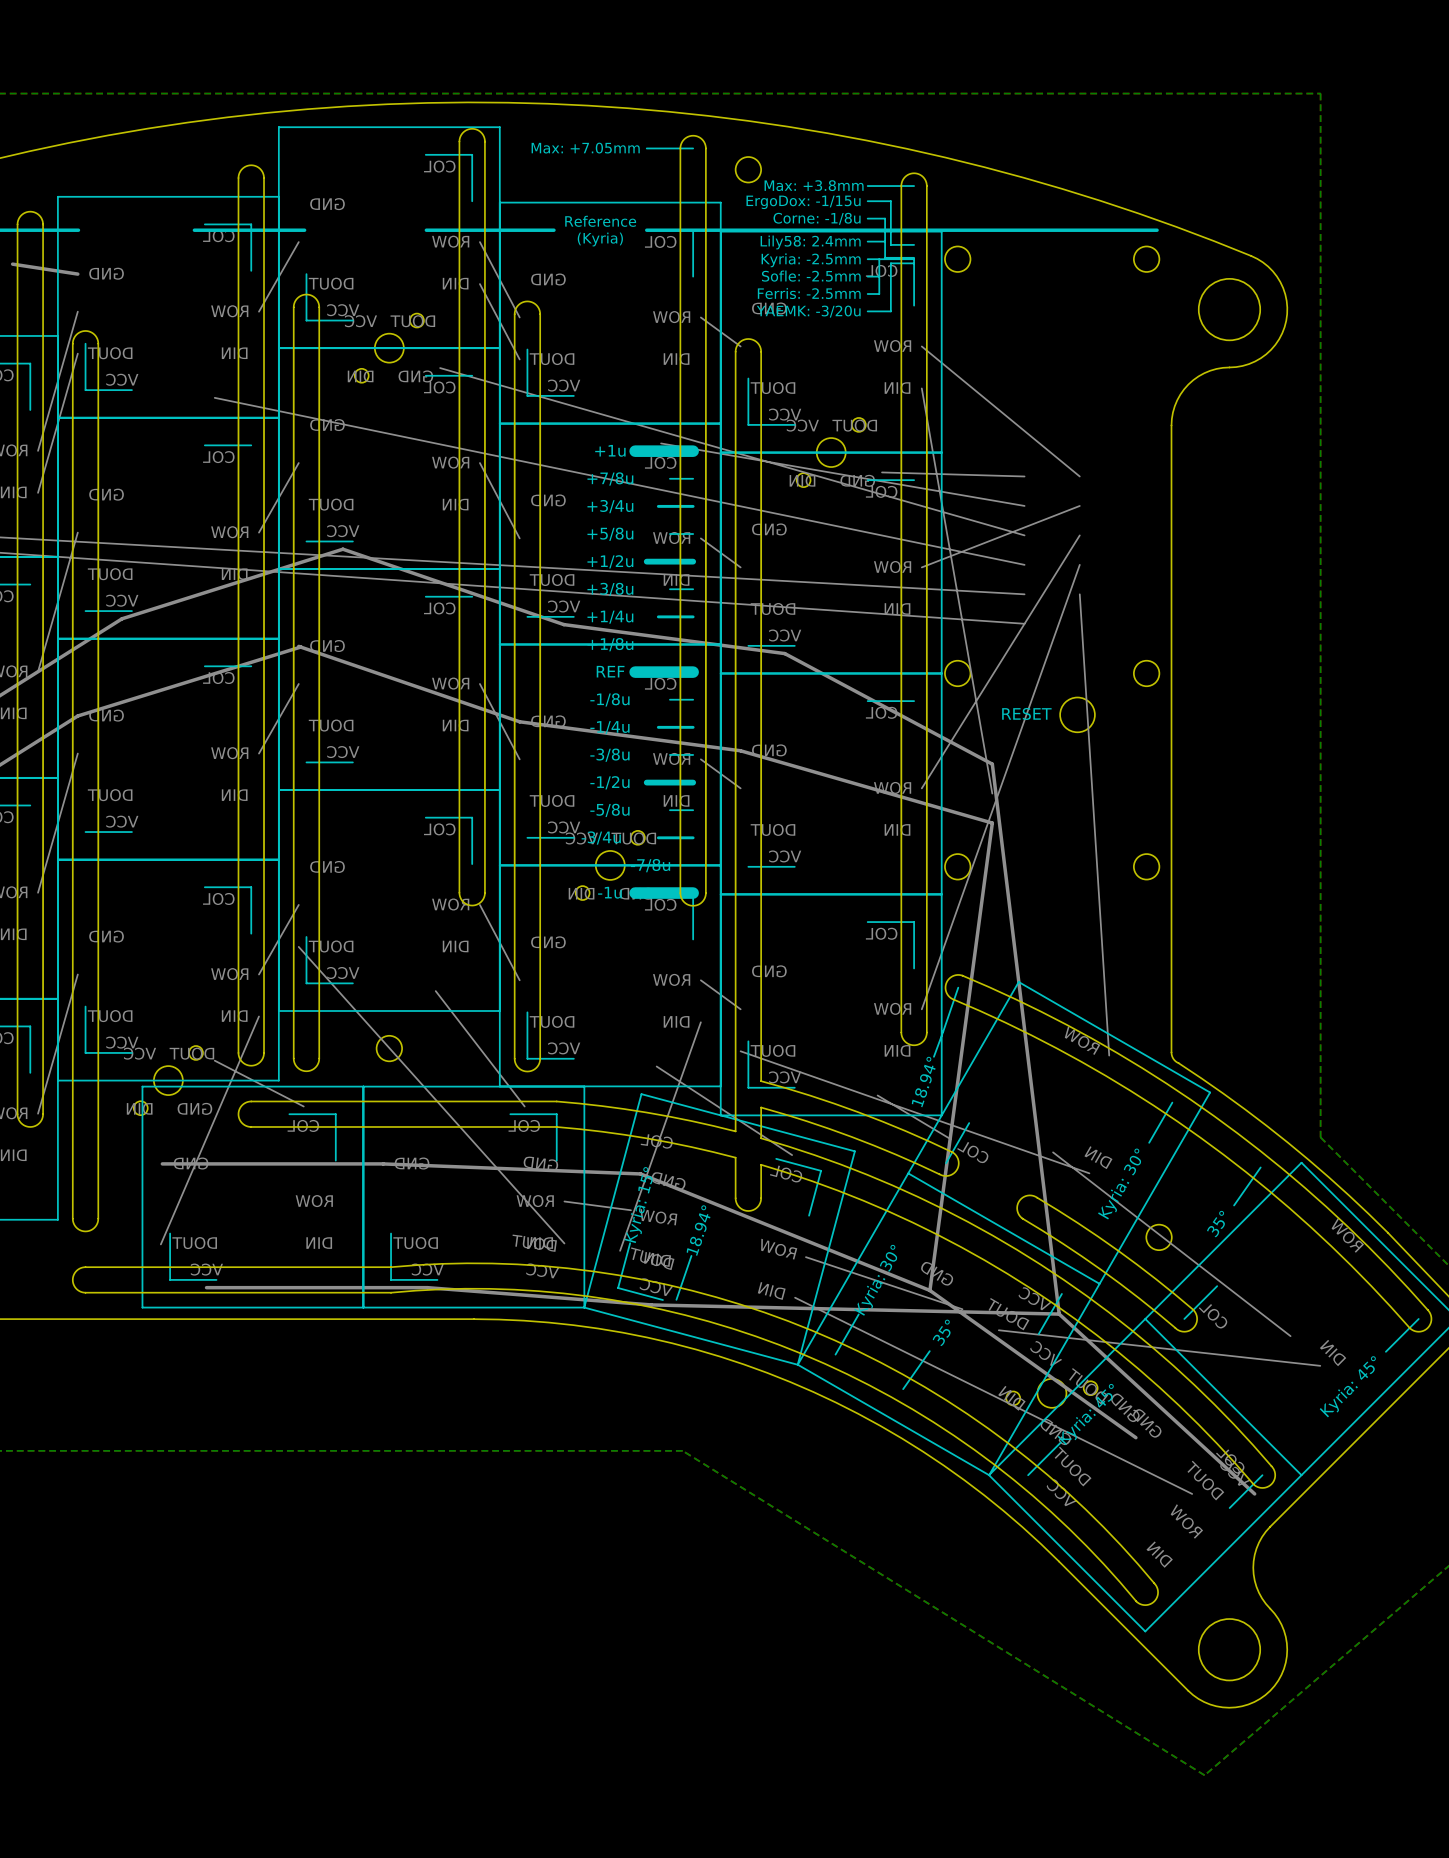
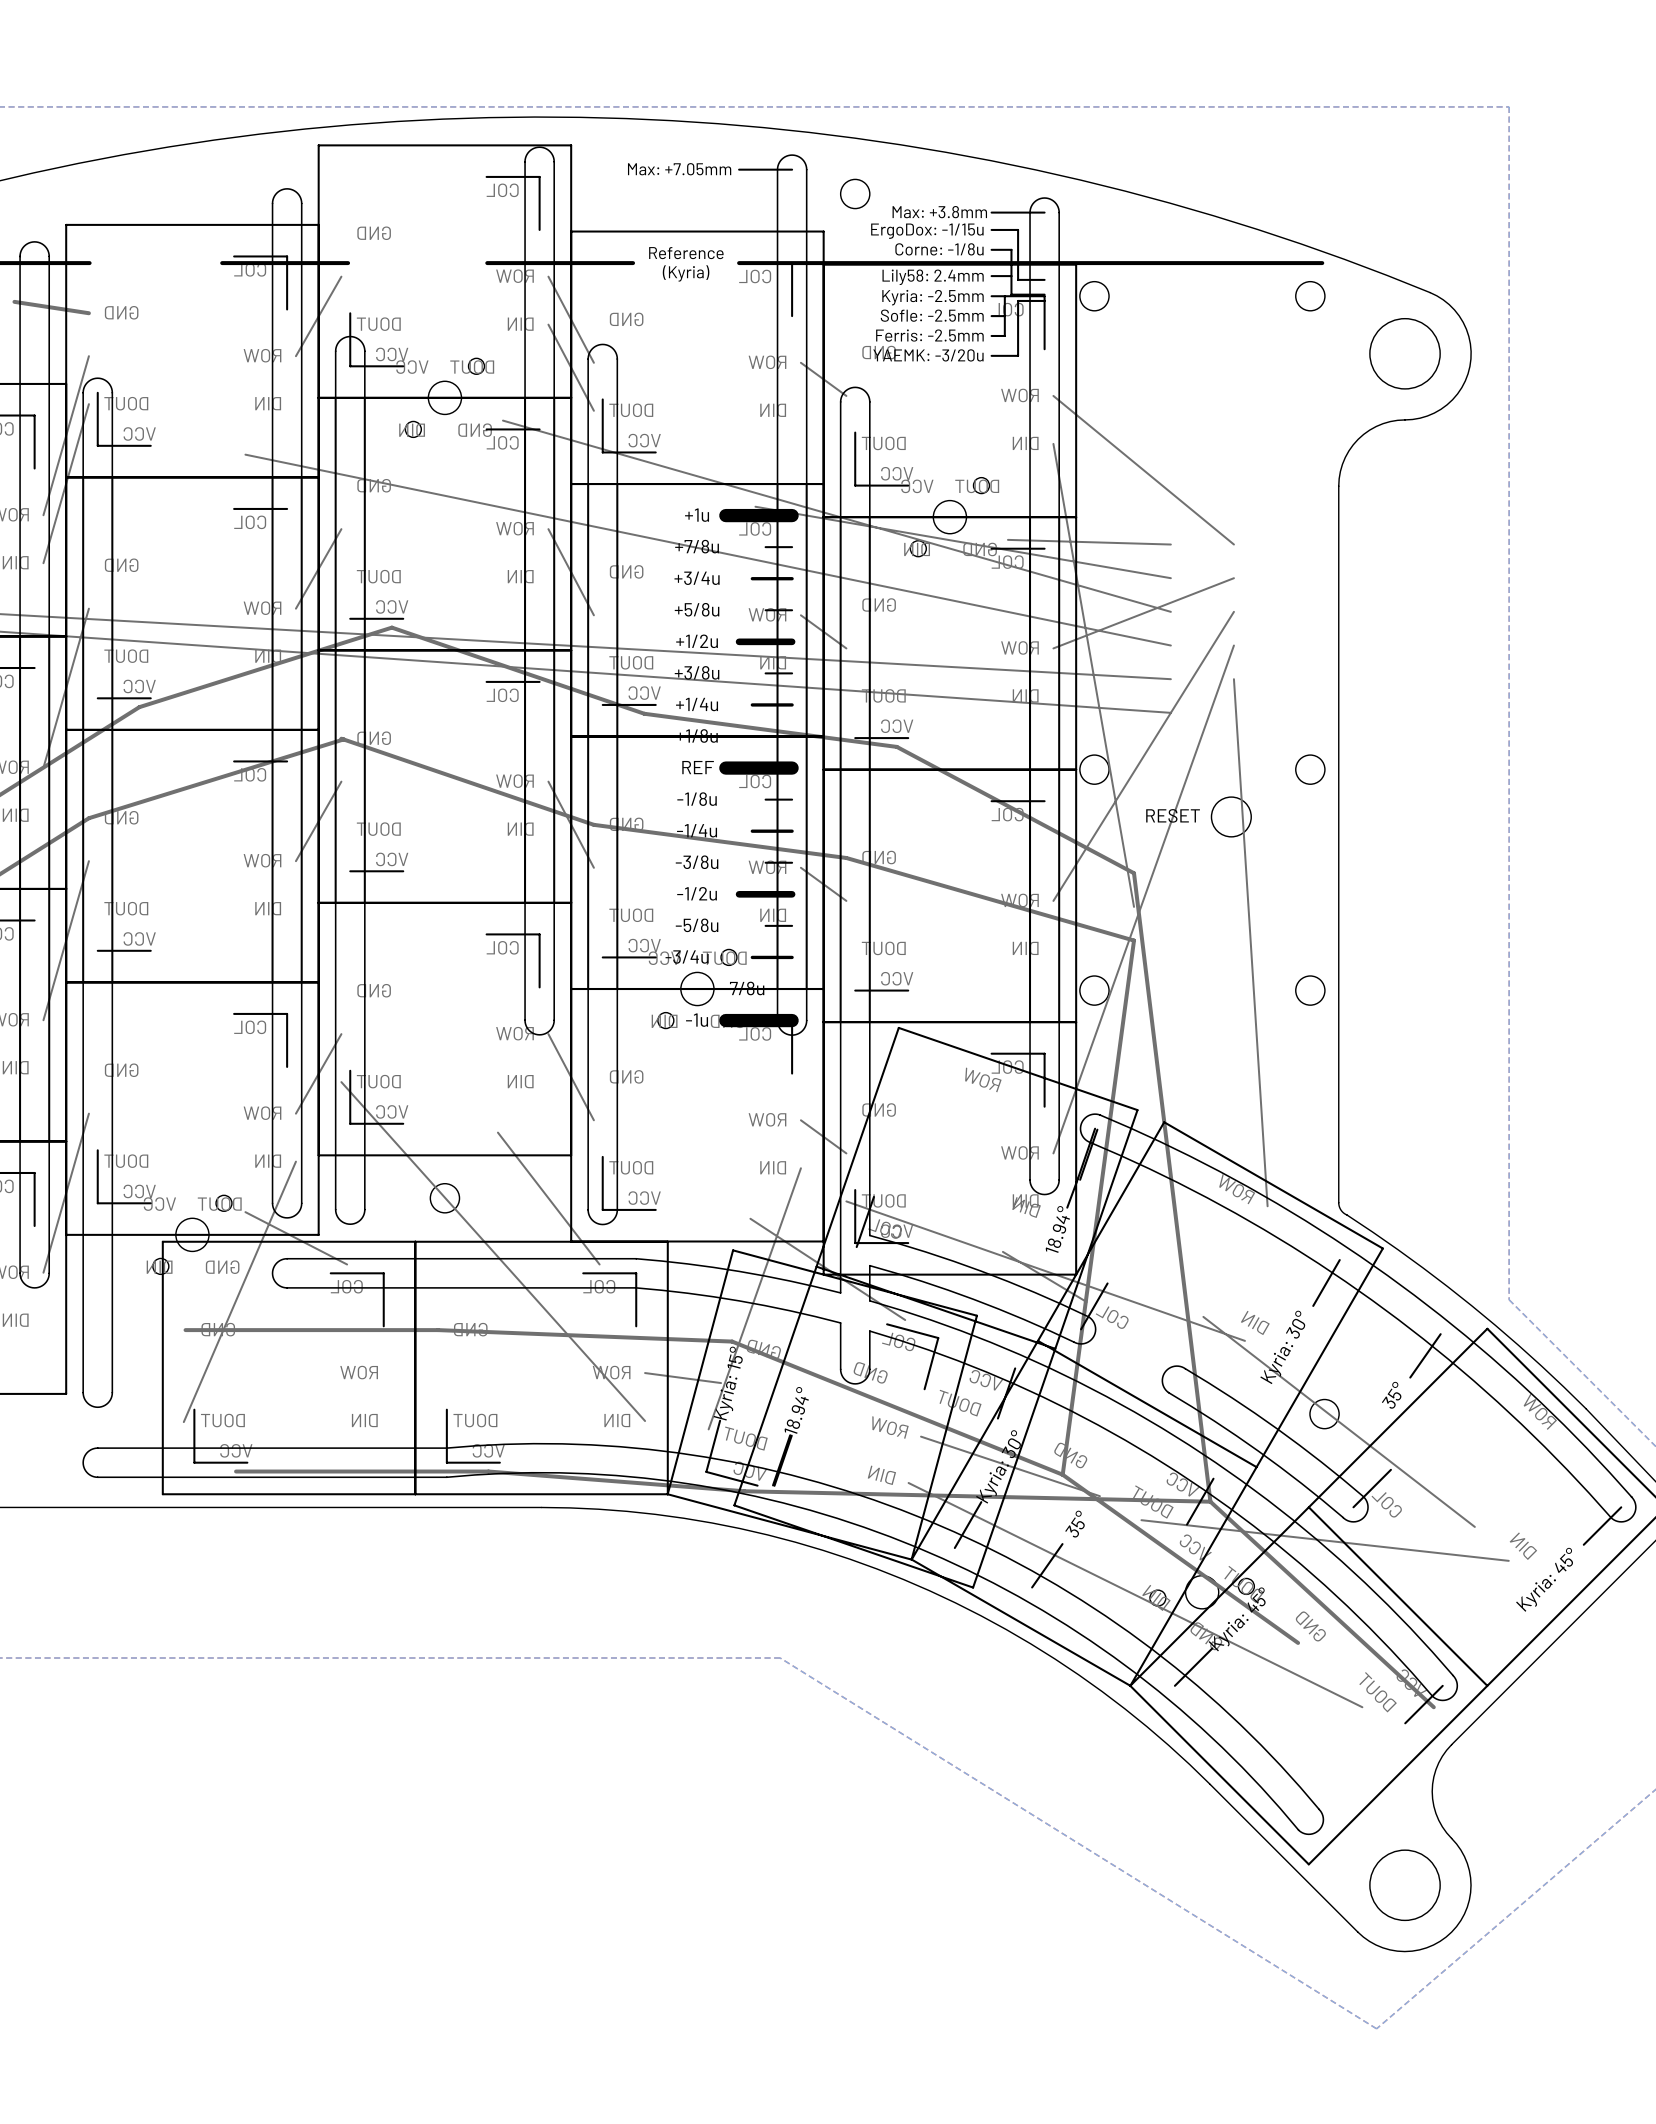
drawing: none -> [733, 1026, 1139, 1589]
drawing: [512, 1134, 678, 1279] -> none
drawing: [1046, 1393, 1245, 1568] -> none

